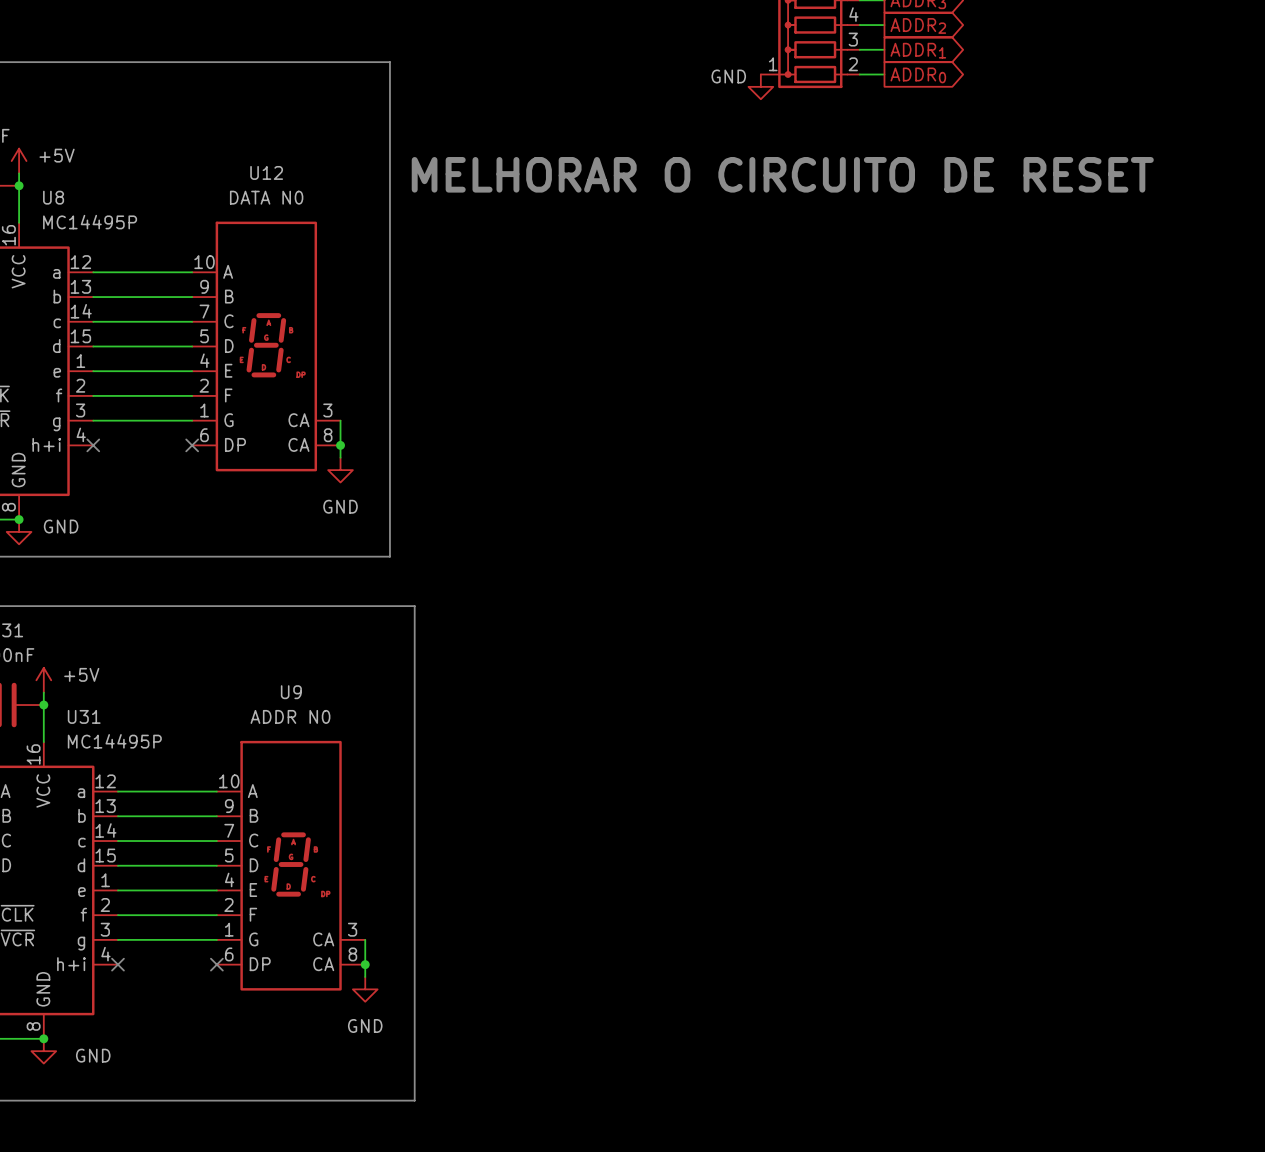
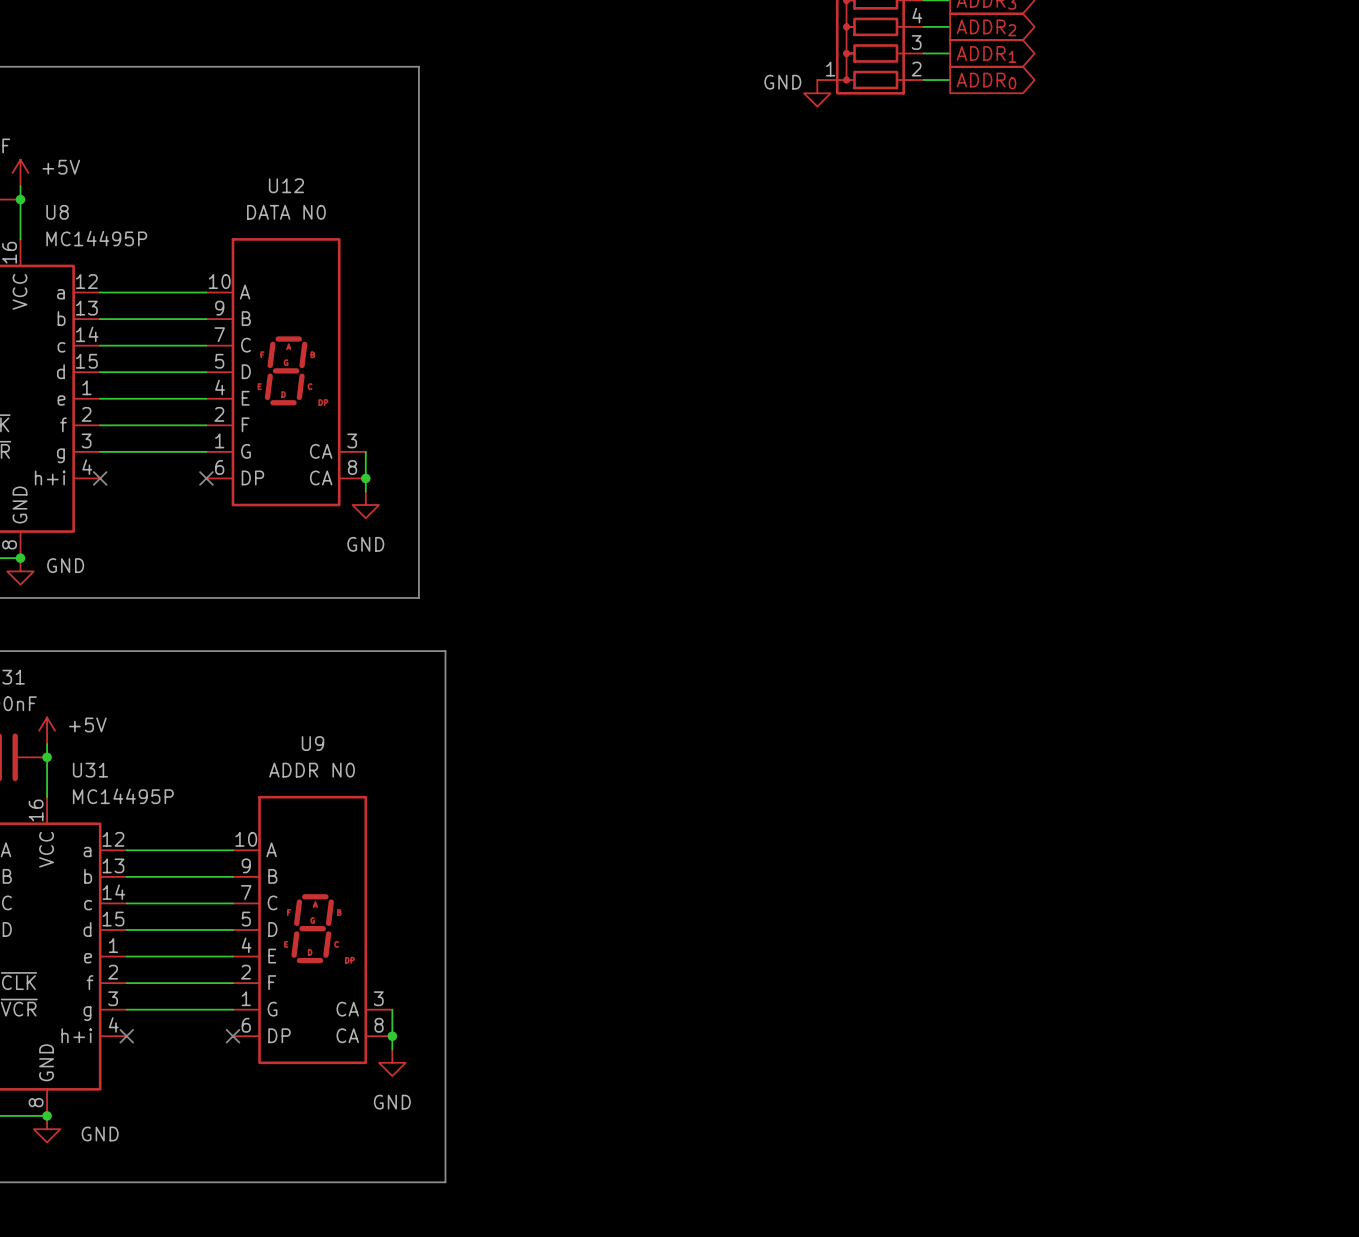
text: MELHORAR O CIRCUITO DE RESET (782, 174) -> none

